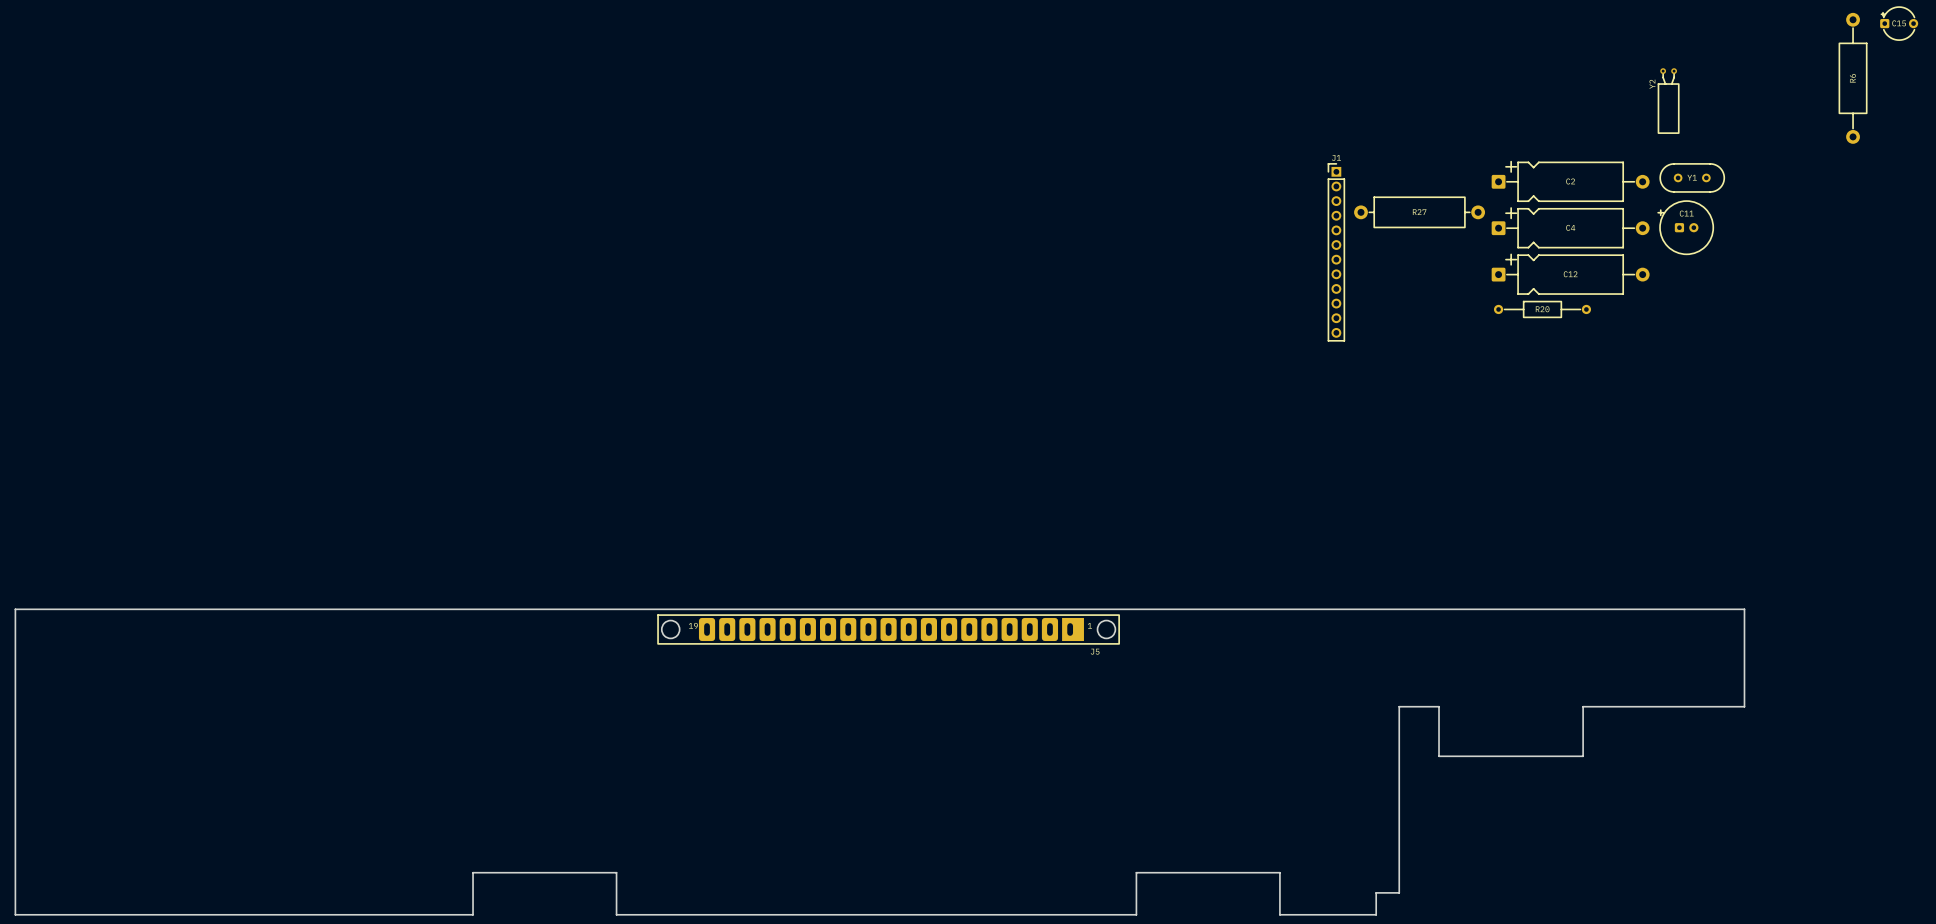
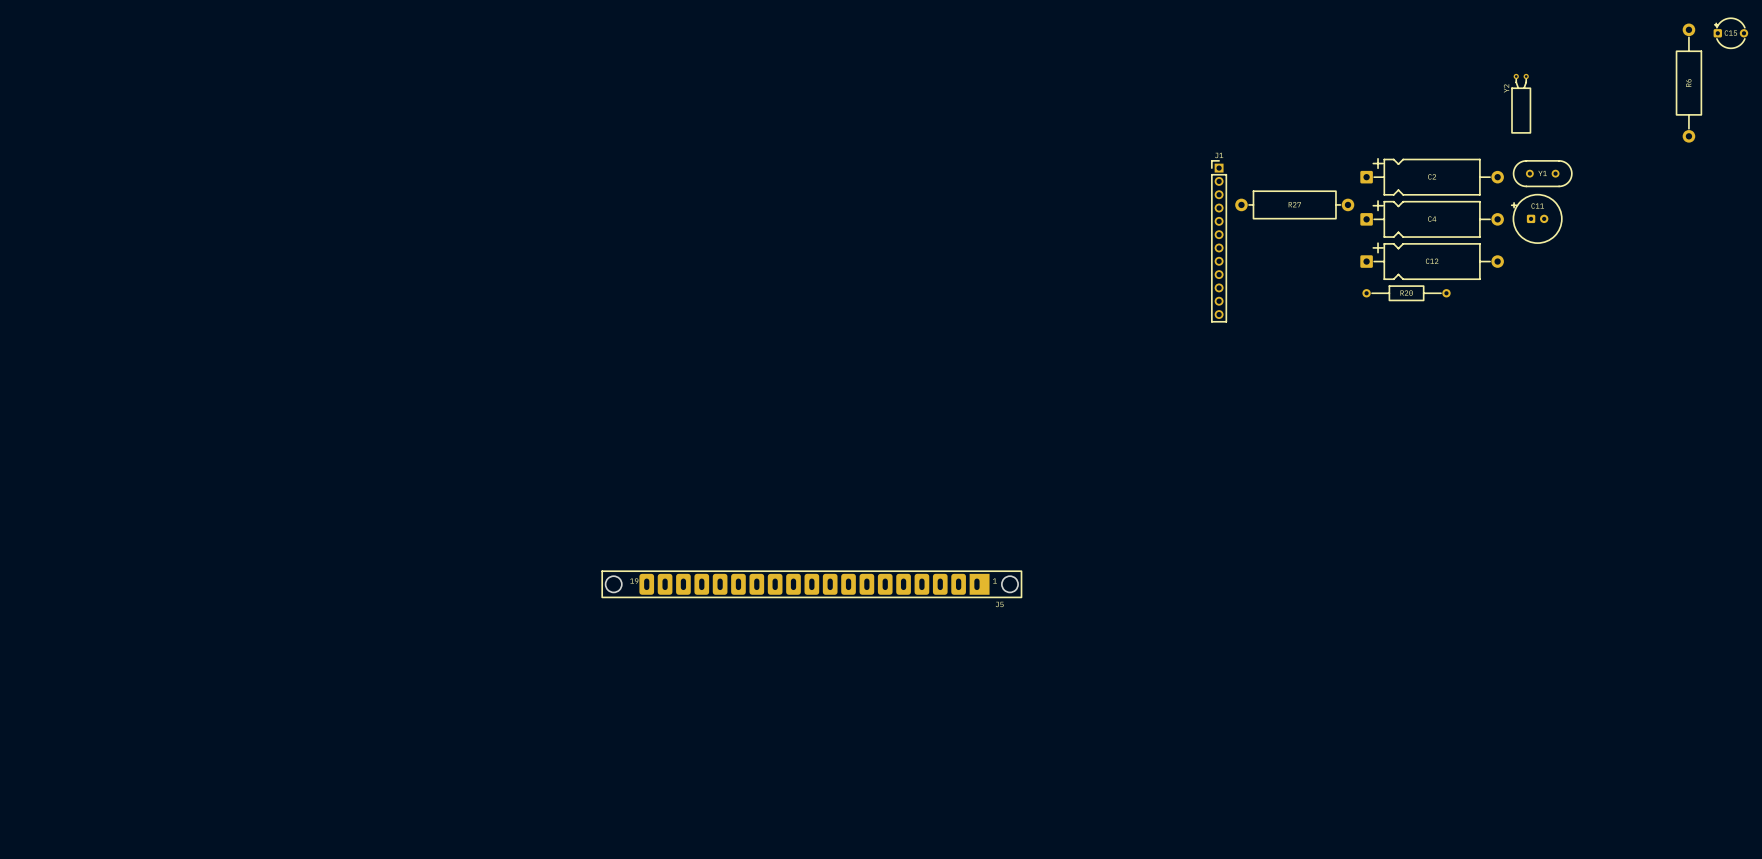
board edge: (15, 609) (15, 914) (473, 914) (473, 872) (616, 872) (616, 914) (1136, 914) (1136, 872) (1279, 872) (1279, 914) (1376, 914) (1376, 892) (1399, 892) (1399, 706) (1439, 706) (1439, 756) (1583, 756) (1583, 706) (1744, 706) (1744, 609) (15, 609) -> none

